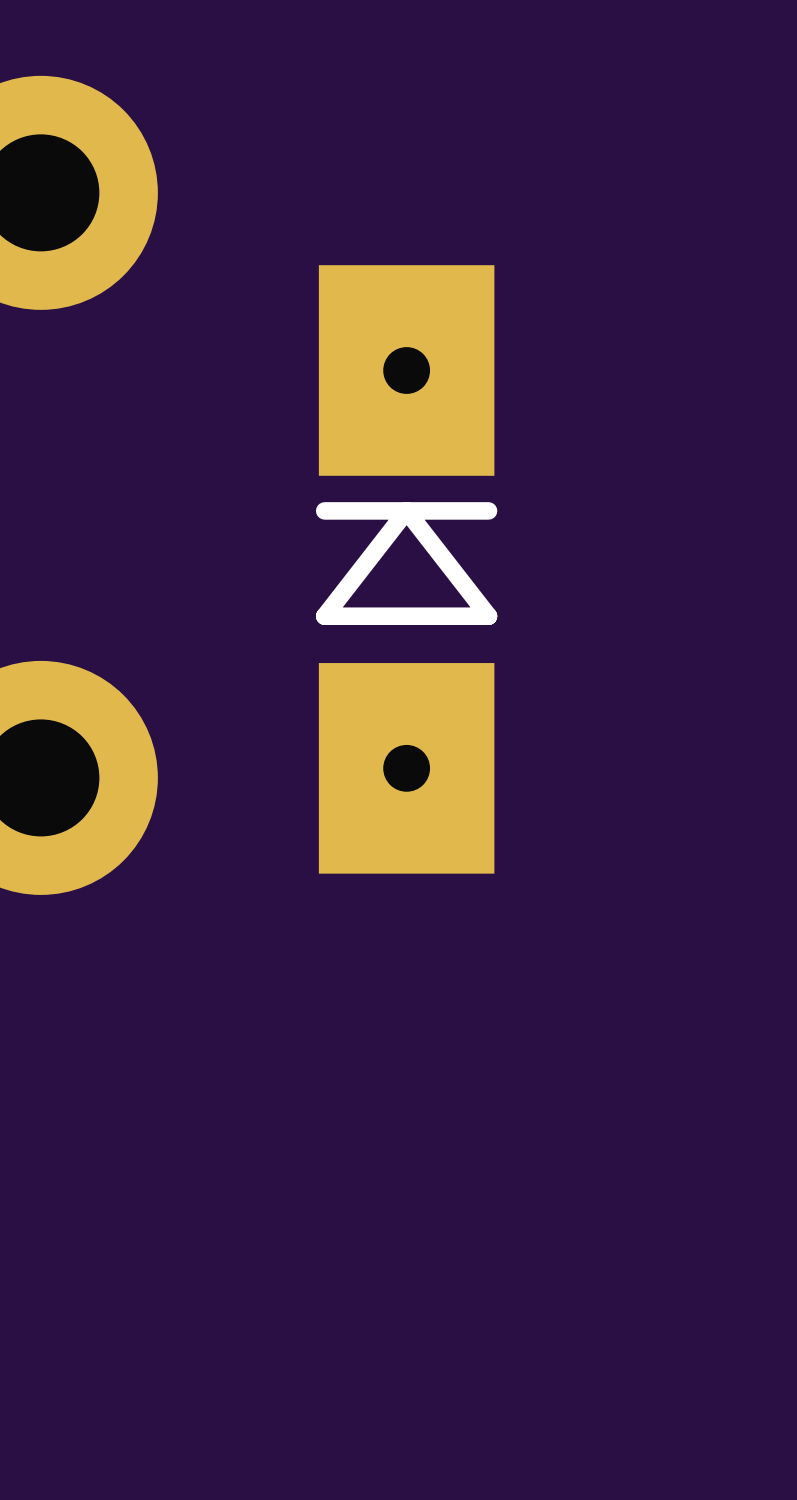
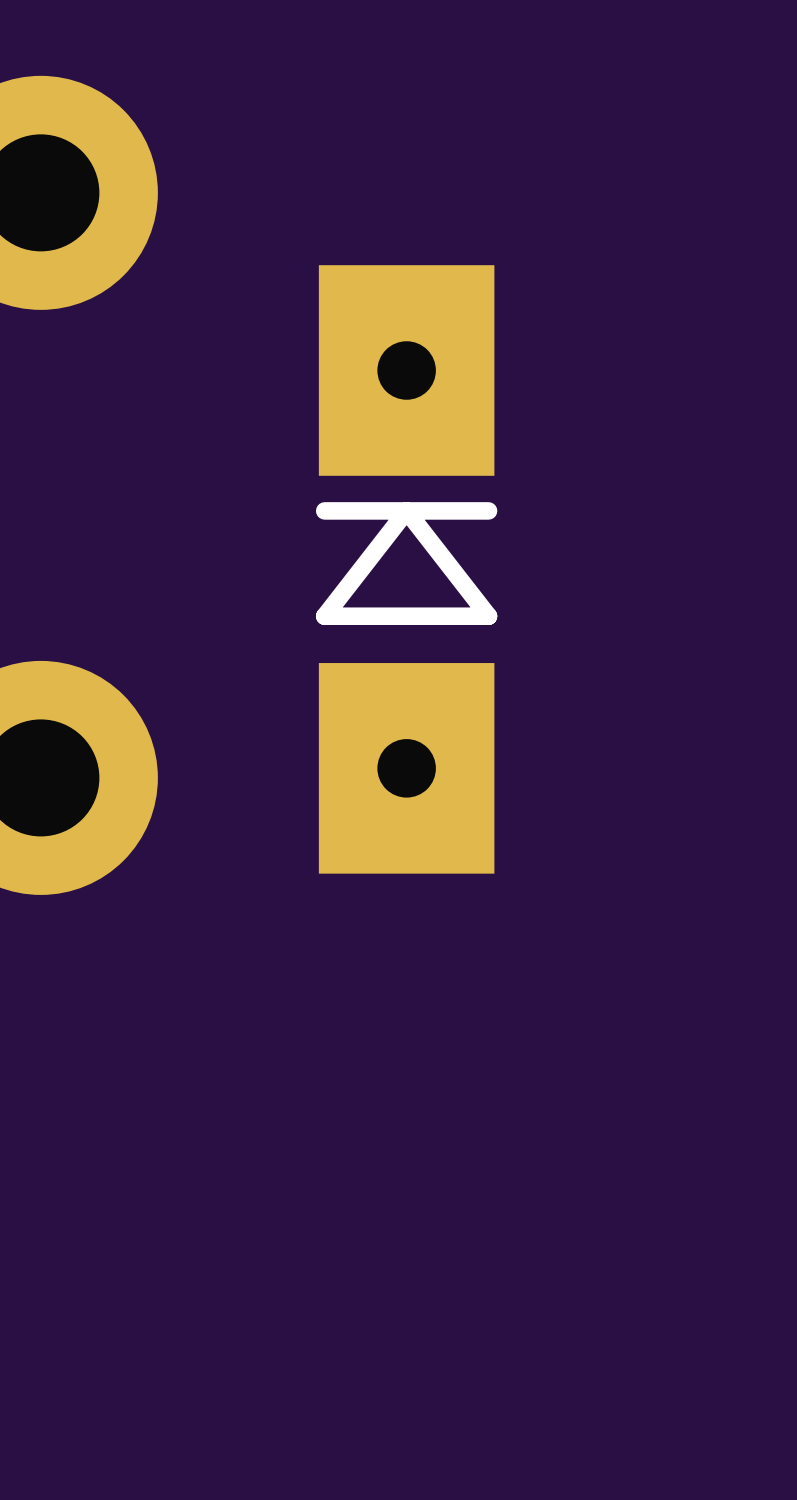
part footprint: [315, 265, 498, 874] -> [315, 265, 498, 874]

